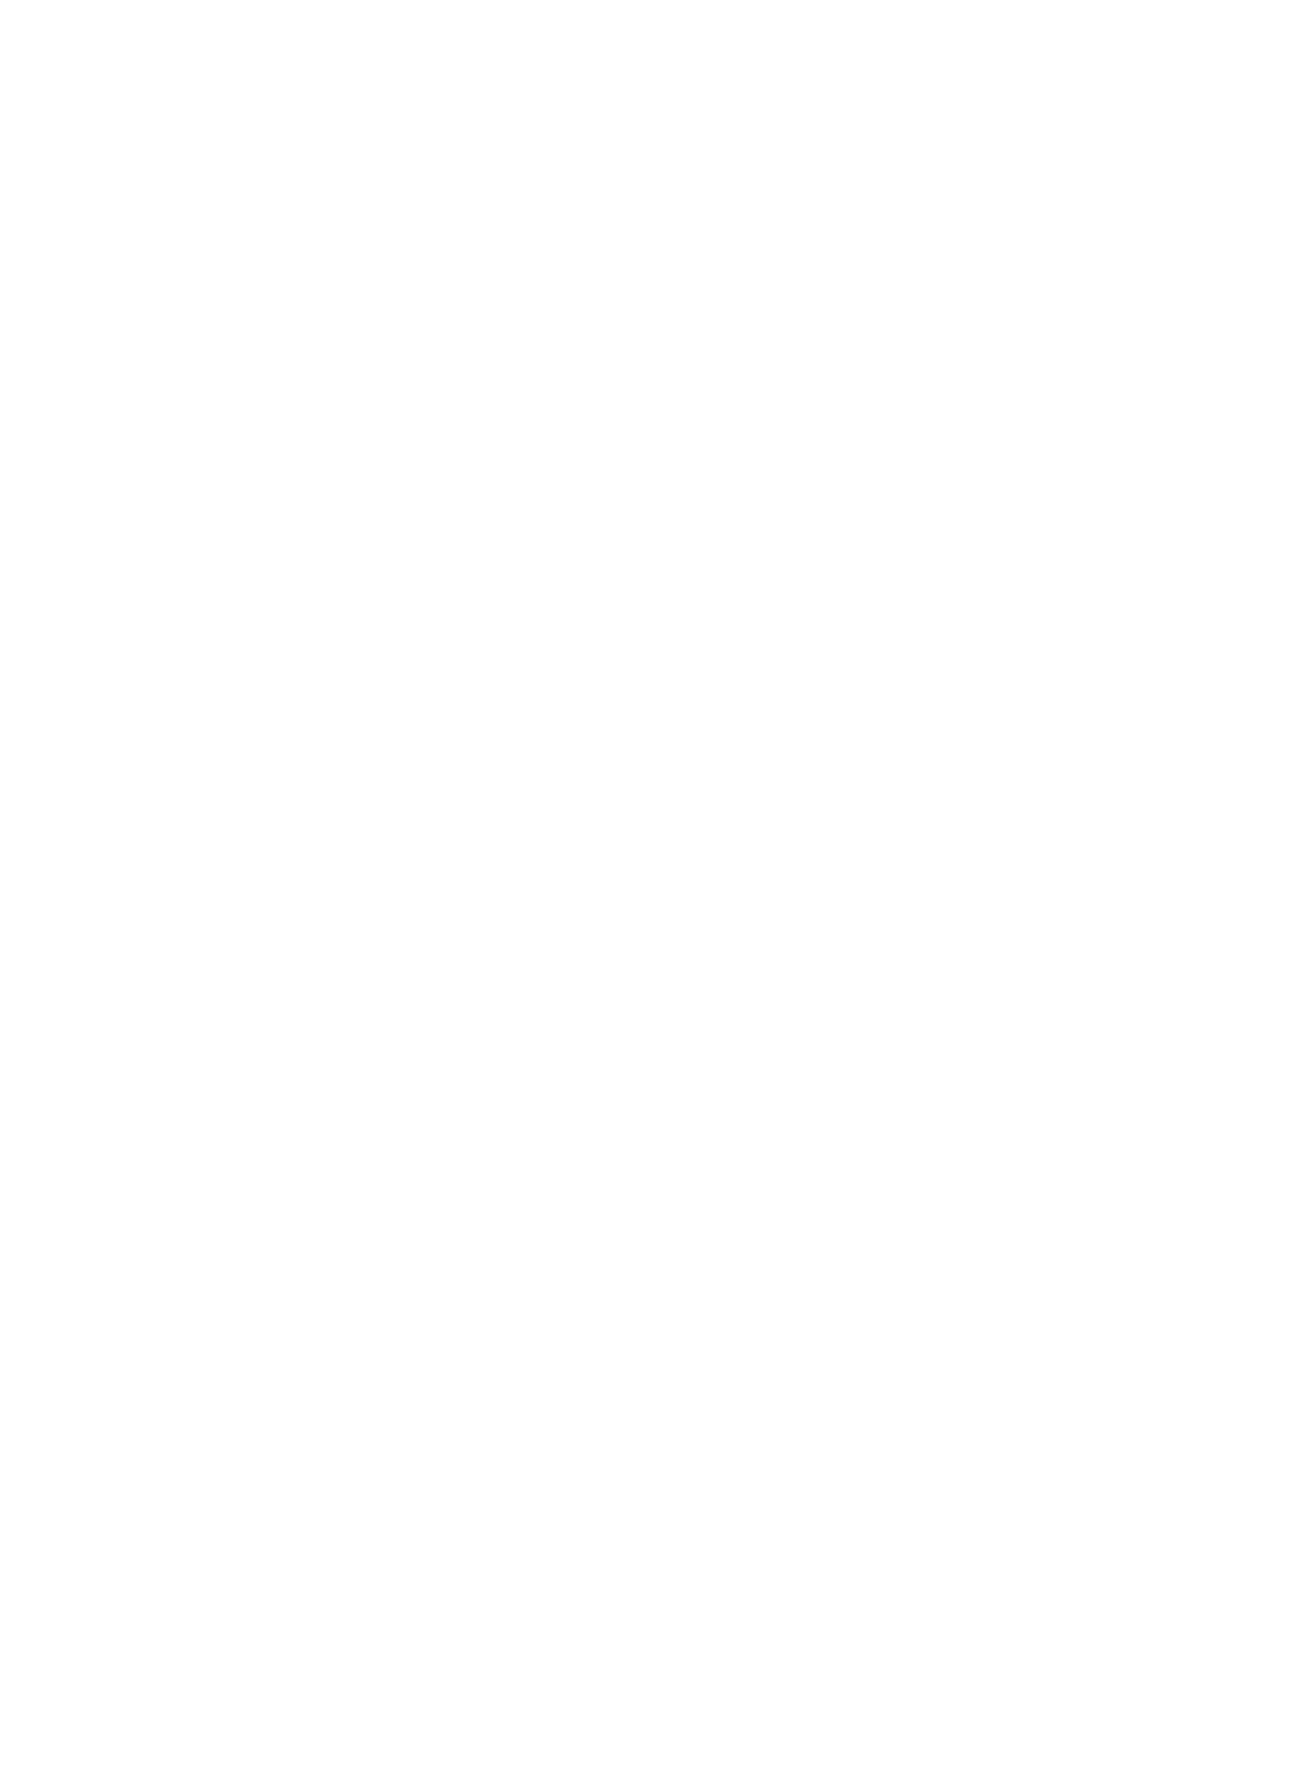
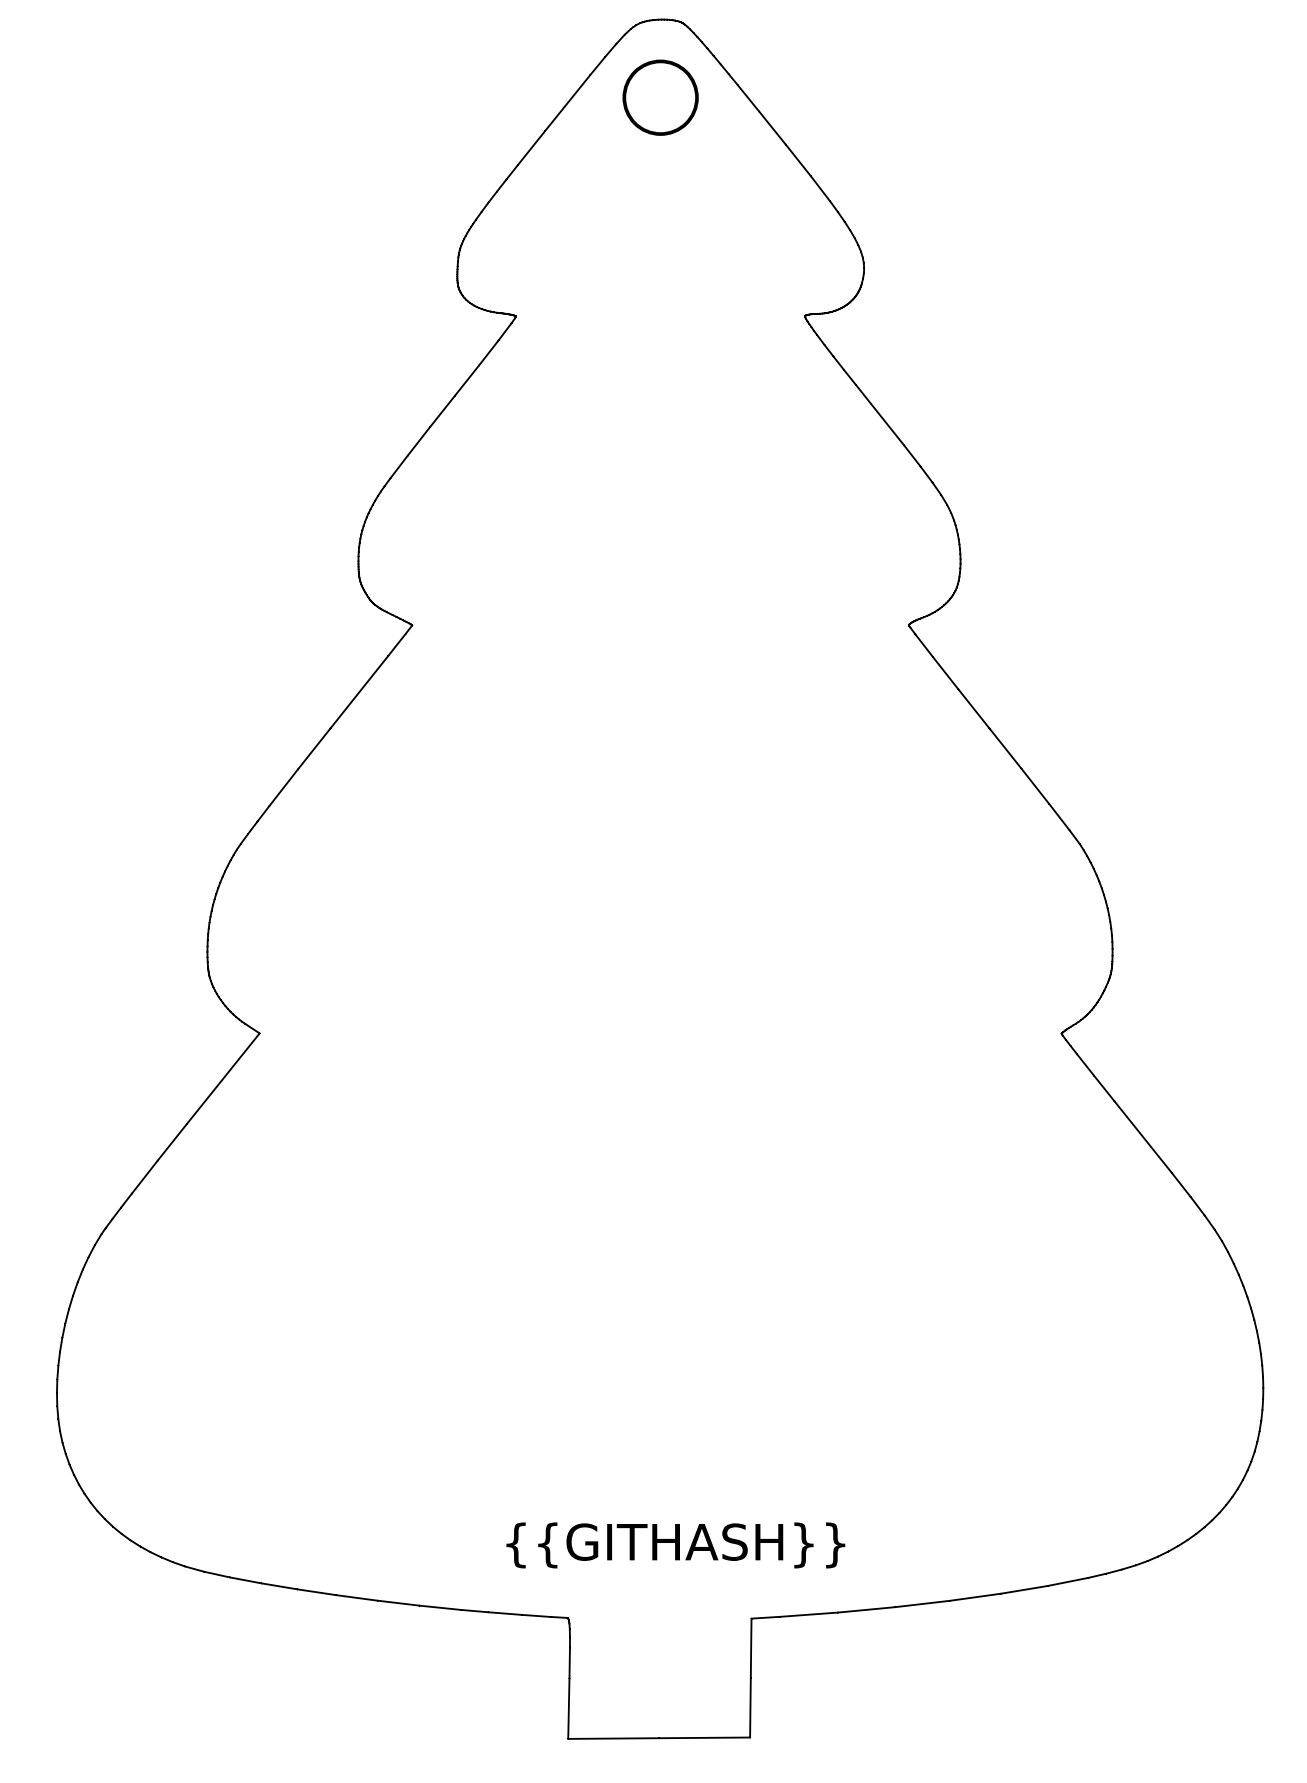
round board edge: none -> [622, 59, 699, 136]
board edge: none -> (515, 316) (479, 308) (467, 301) (461, 294) (457, 284) (457, 269) (459, 252) (464, 238) (496, 191) (616, 43) (635, 25) (647, 21) (661, 19) (682, 22) (702, 42) (810, 175) (844, 221) (858, 245) (862, 257) (863, 273) (860, 287) (855, 296) (848, 303) (837, 309) (805, 315)
board edge: none -> (516, 316) (384, 486) (372, 504) (363, 526) (358, 561) (359, 577) (362, 587) (376, 606) (412, 625)
board edge: none -> (804, 316) (824, 344) (932, 482) (947, 504) (954, 520) (960, 554) (960, 572) (956, 587) (951, 597) (942, 606) (909, 624)
board edge: none -> (412, 625) (257, 821) (227, 865) (218, 888) (210, 916) (207, 946) (209, 974) (215, 990) (225, 1006) (239, 1019) (259, 1033) (101, 1234) (82, 1269) (68, 1309) (60, 1351) (56, 1393) (60, 1431) (65, 1453) (73, 1474) (90, 1502) (112, 1526) (140, 1546) (184, 1566) (261, 1583) (419, 1605) (567, 1618) (569, 1637) (568, 1738) (750, 1737) (751, 1618) (894, 1607) (1000, 1593) (1106, 1573) (1135, 1565) (1168, 1551) (1196, 1533) (1219, 1512) (1237, 1488) (1251, 1461) (1259, 1431) (1263, 1399) (1262, 1365) (1257, 1331) (1238, 1274) (1214, 1229) (1061, 1033)
board edge: none -> (908, 625) (1069, 830) (1087, 856) (1099, 881) (1111, 928) (1112, 955) (1110, 974) (1102, 993) (1091, 1009) (1061, 1033)
text: none -> {{GITHASH}} (675, 1545)

